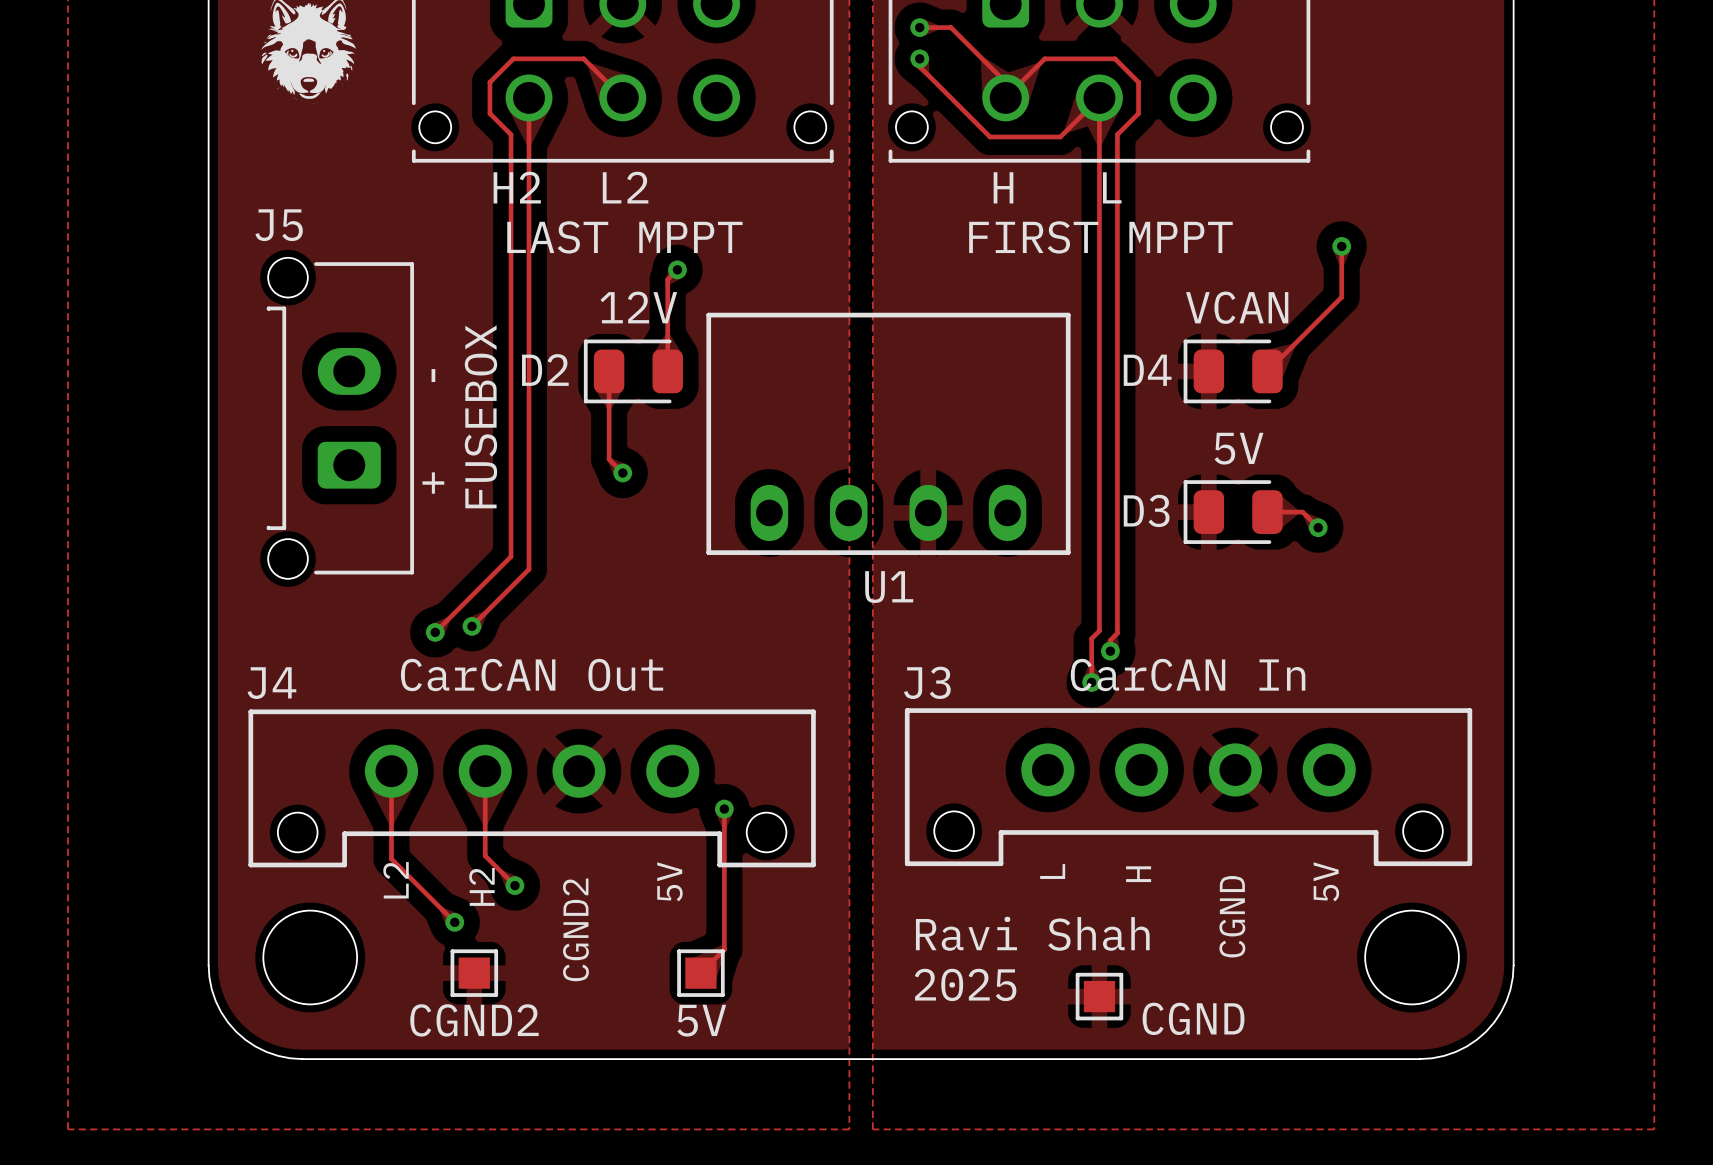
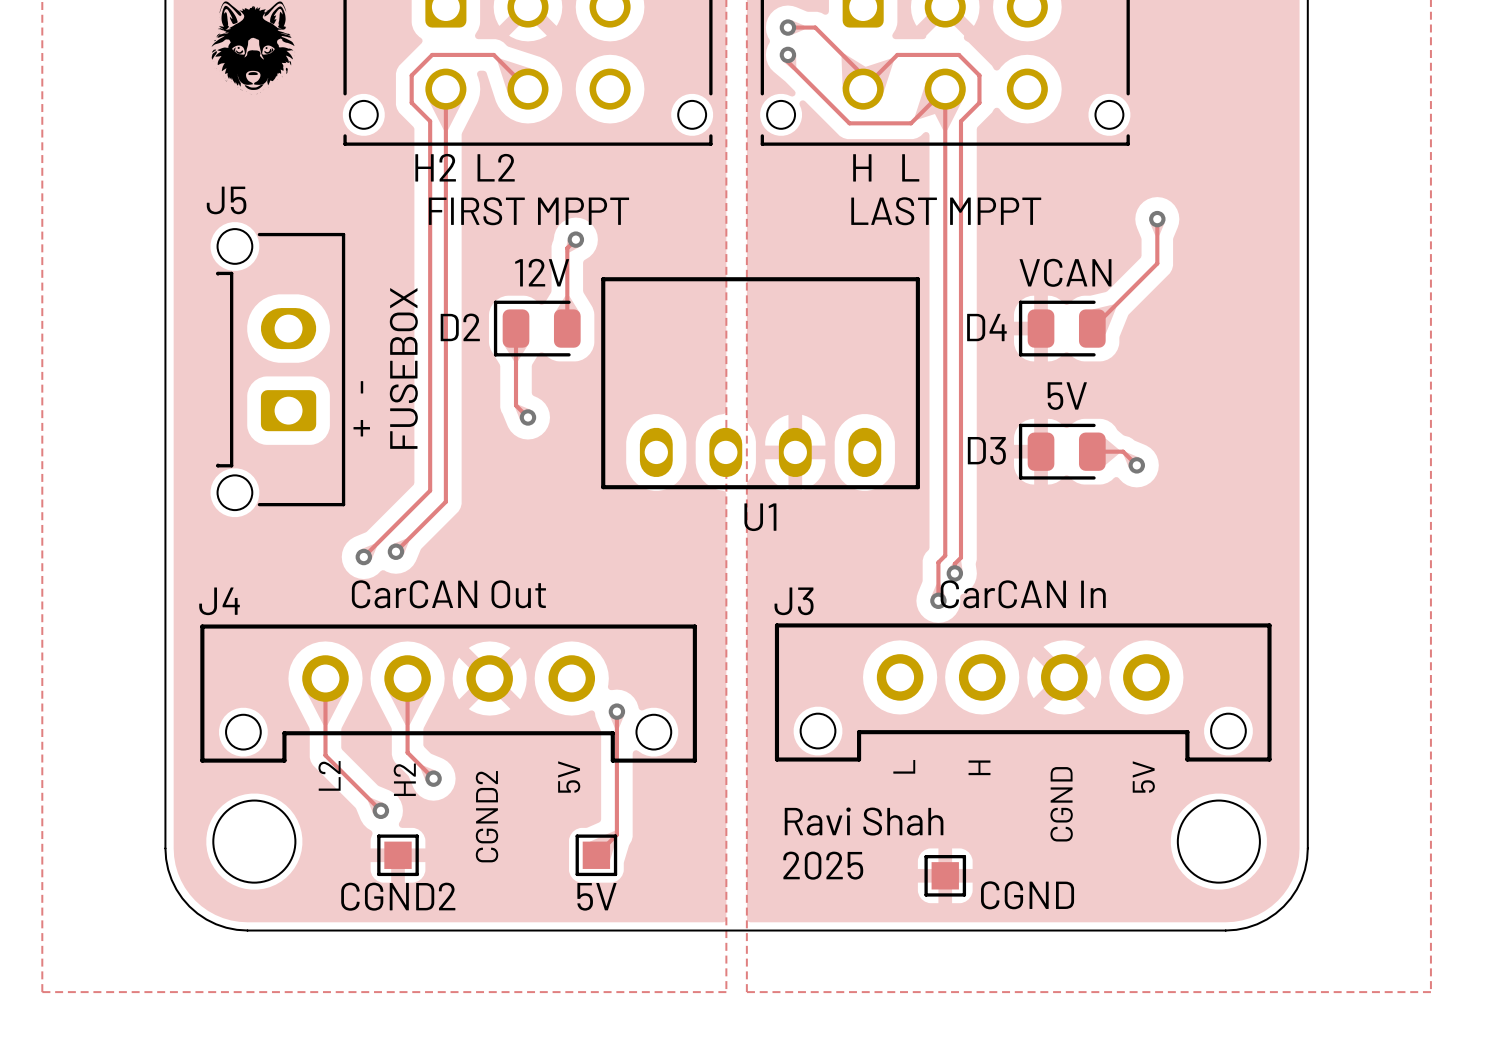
part value: LAST MPPT (624, 237) -> FIRST MPPT (528, 211)
part value: FIRST MPPT (1100, 237) -> LAST MPPT (946, 211)

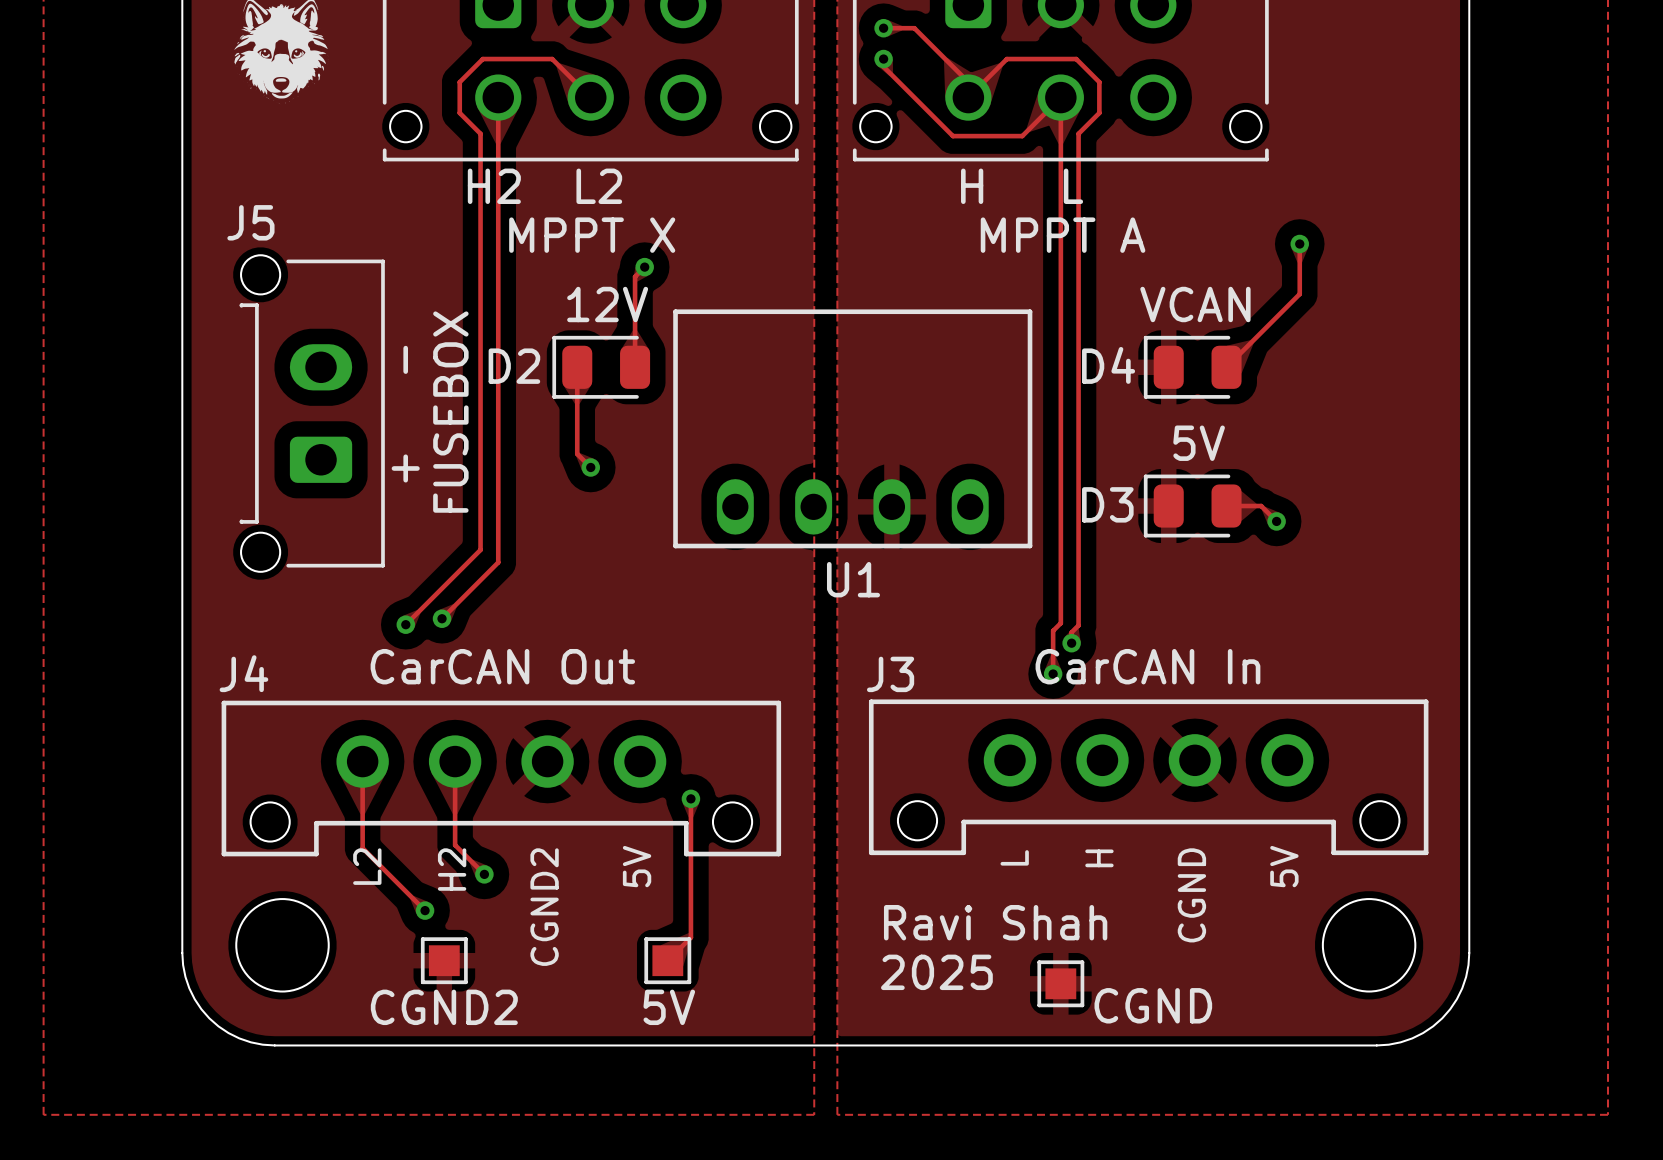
part value: FIRST MPPT (528, 211) -> MPPT X (592, 235)
part value: LAST MPPT (946, 211) -> MPPT A (1063, 235)

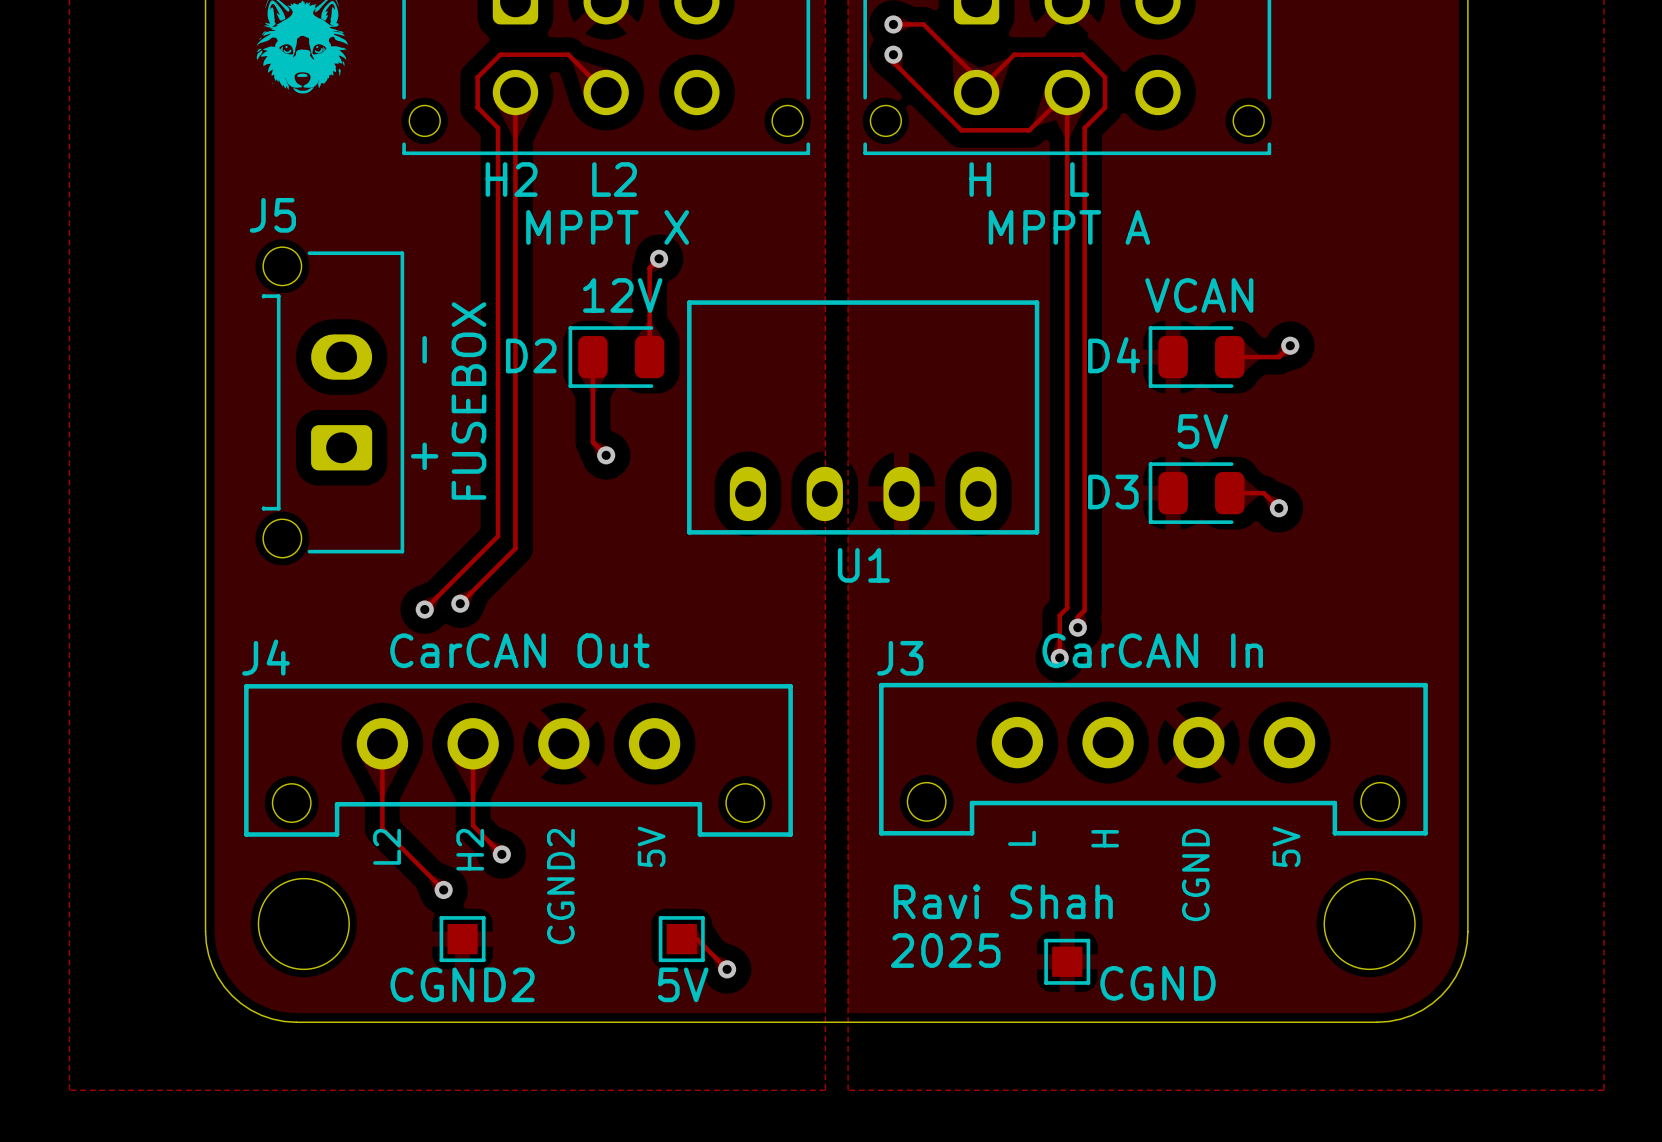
track: (1299, 244) (1299, 294) (1226, 367) -> (1290, 345) (1278, 357) (1229, 357)
via position: (1299, 244) -> (1290, 345)
track: (690, 798) (690, 937) (667, 960) -> (727, 969) (696, 939) (681, 939)
via: (690, 798) -> none
via: none -> (727, 969)

